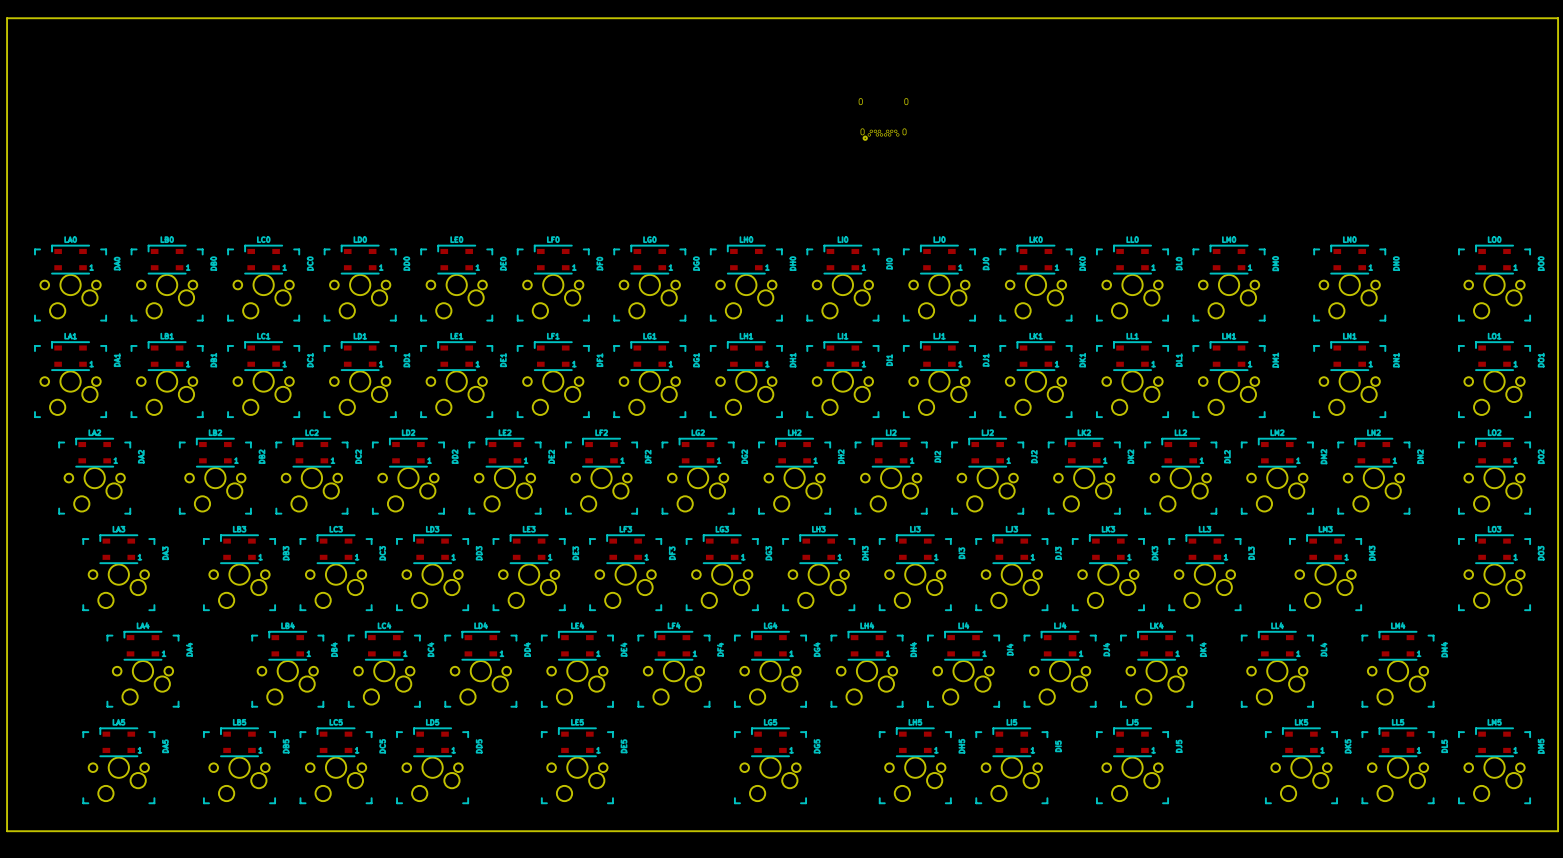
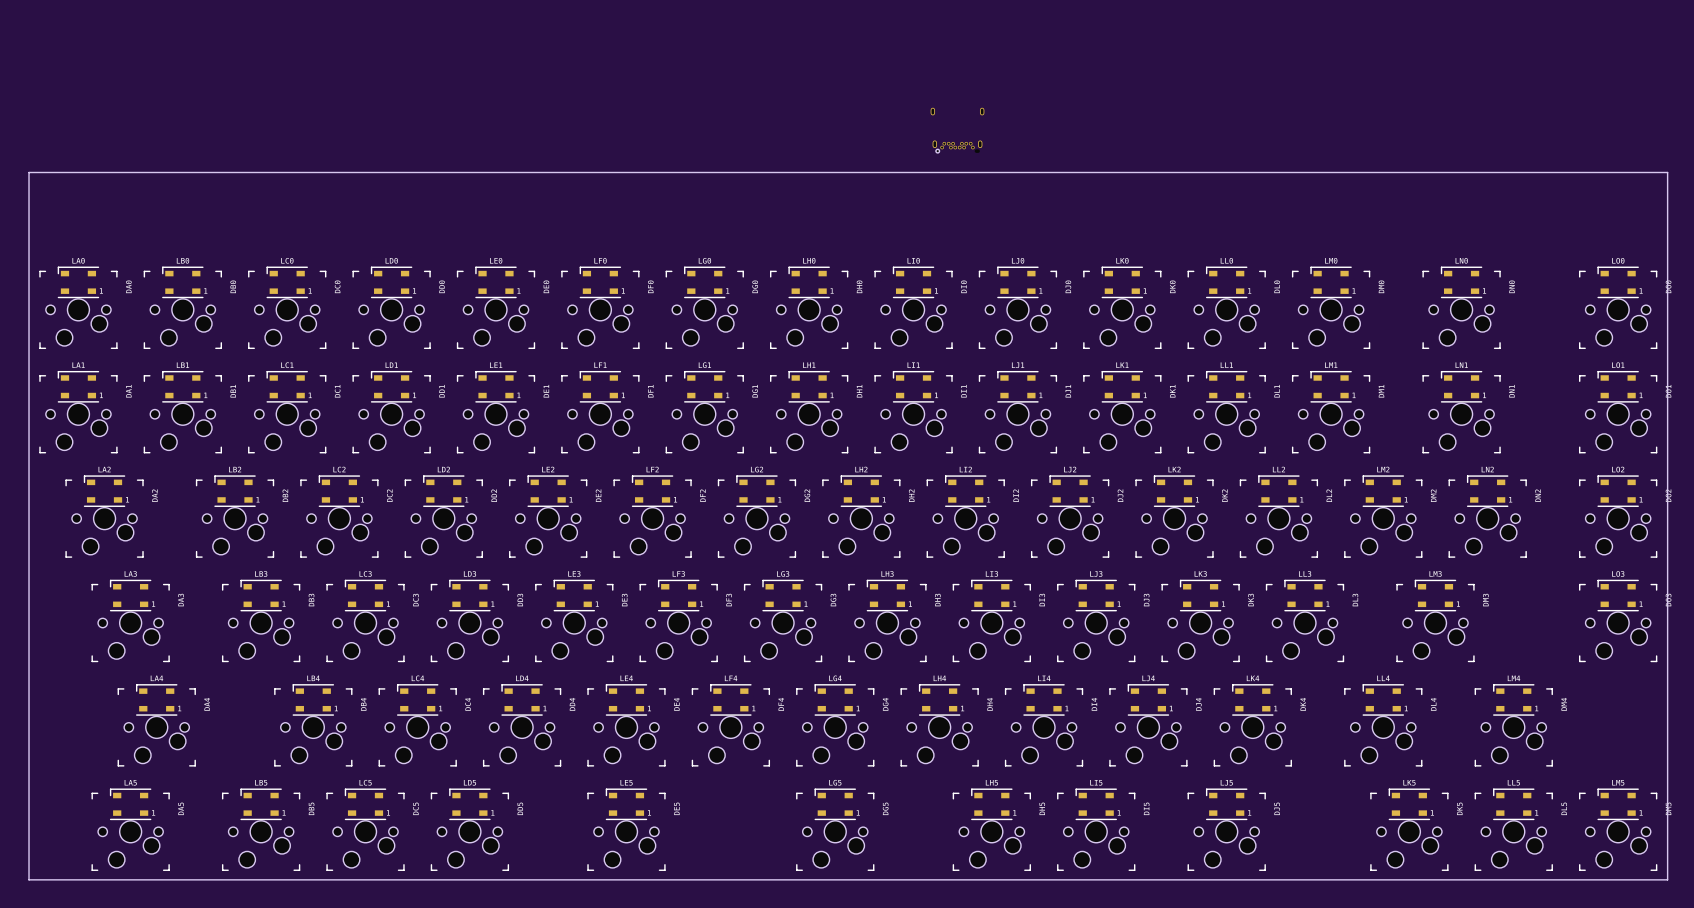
board edge: (7, 18) (7, 831) (1558, 831) (1558, 18) (7, 18) -> (29, 172) (29, 879) (1667, 879) (1667, 172) (29, 172)

